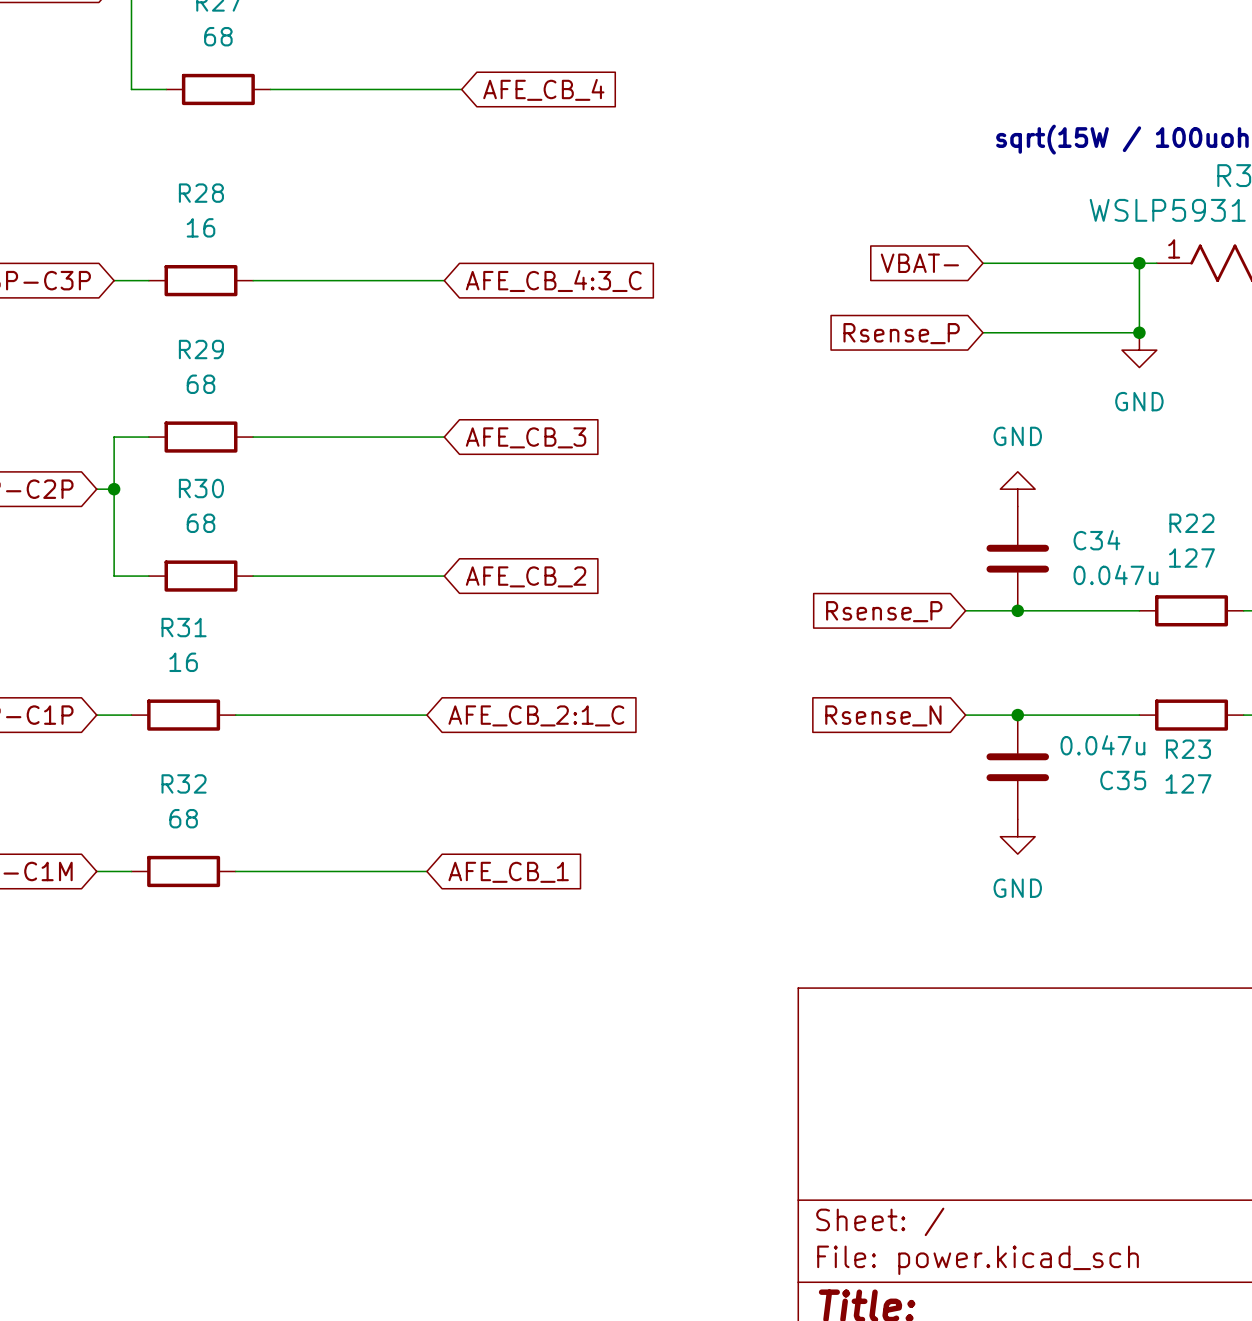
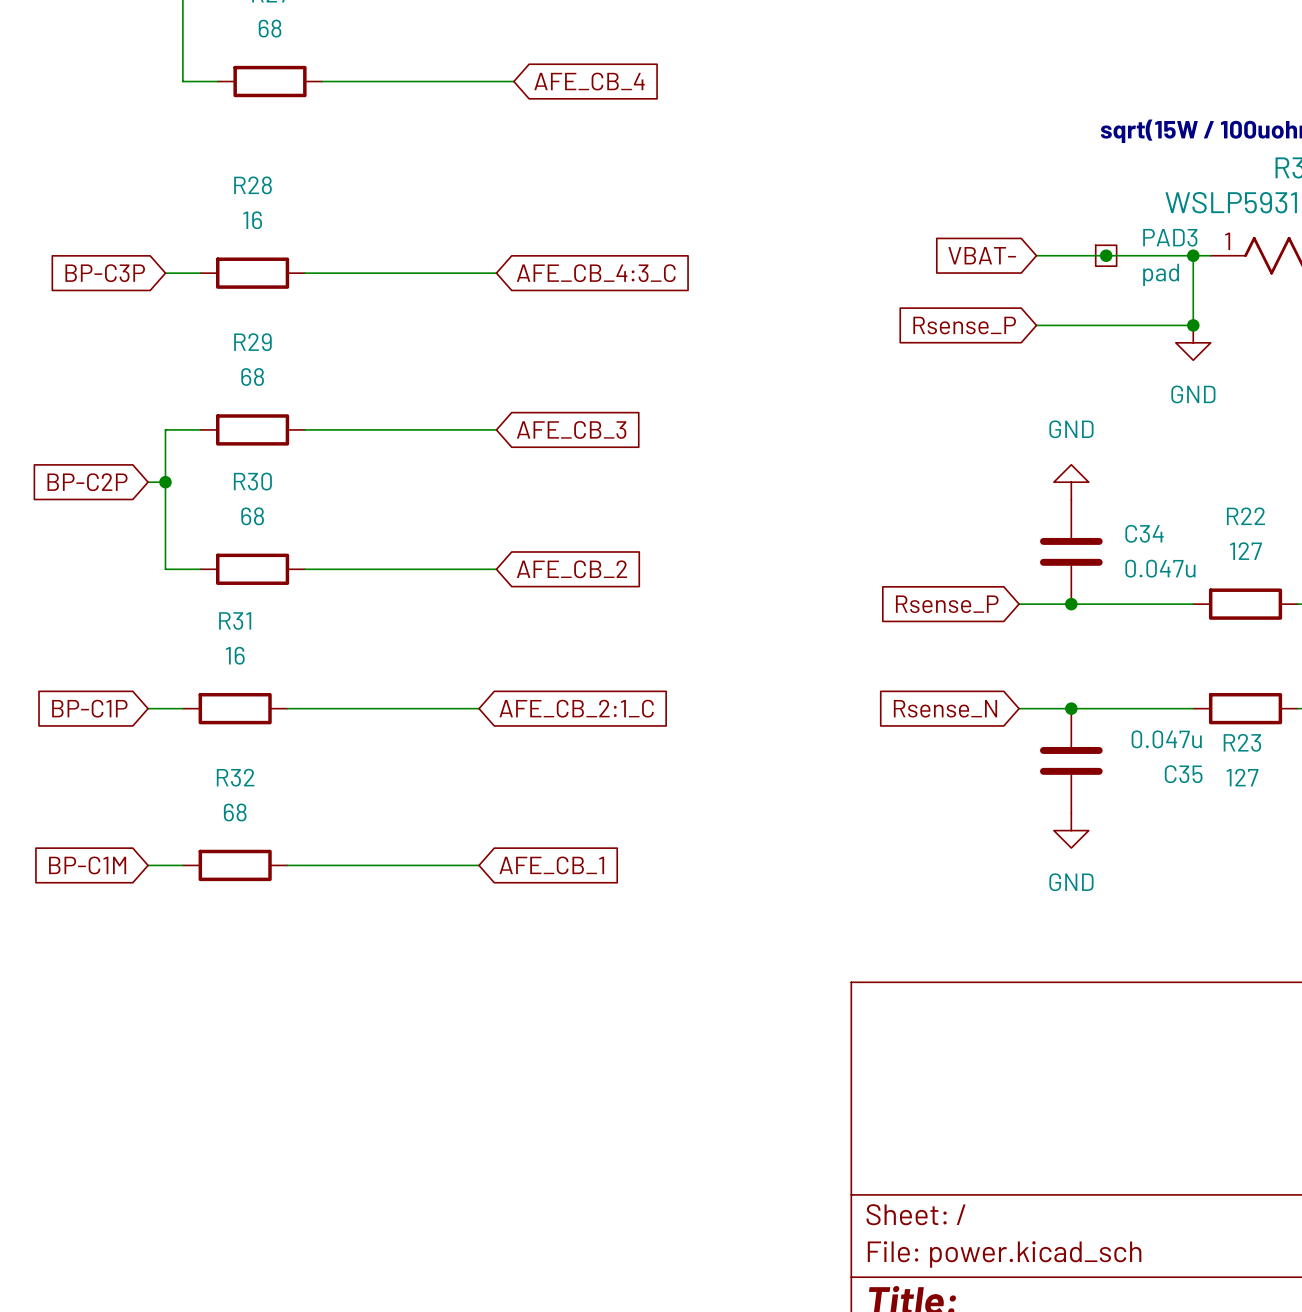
junction: none -> (1106, 255)
PAD3: none -> pad (1106, 255)

